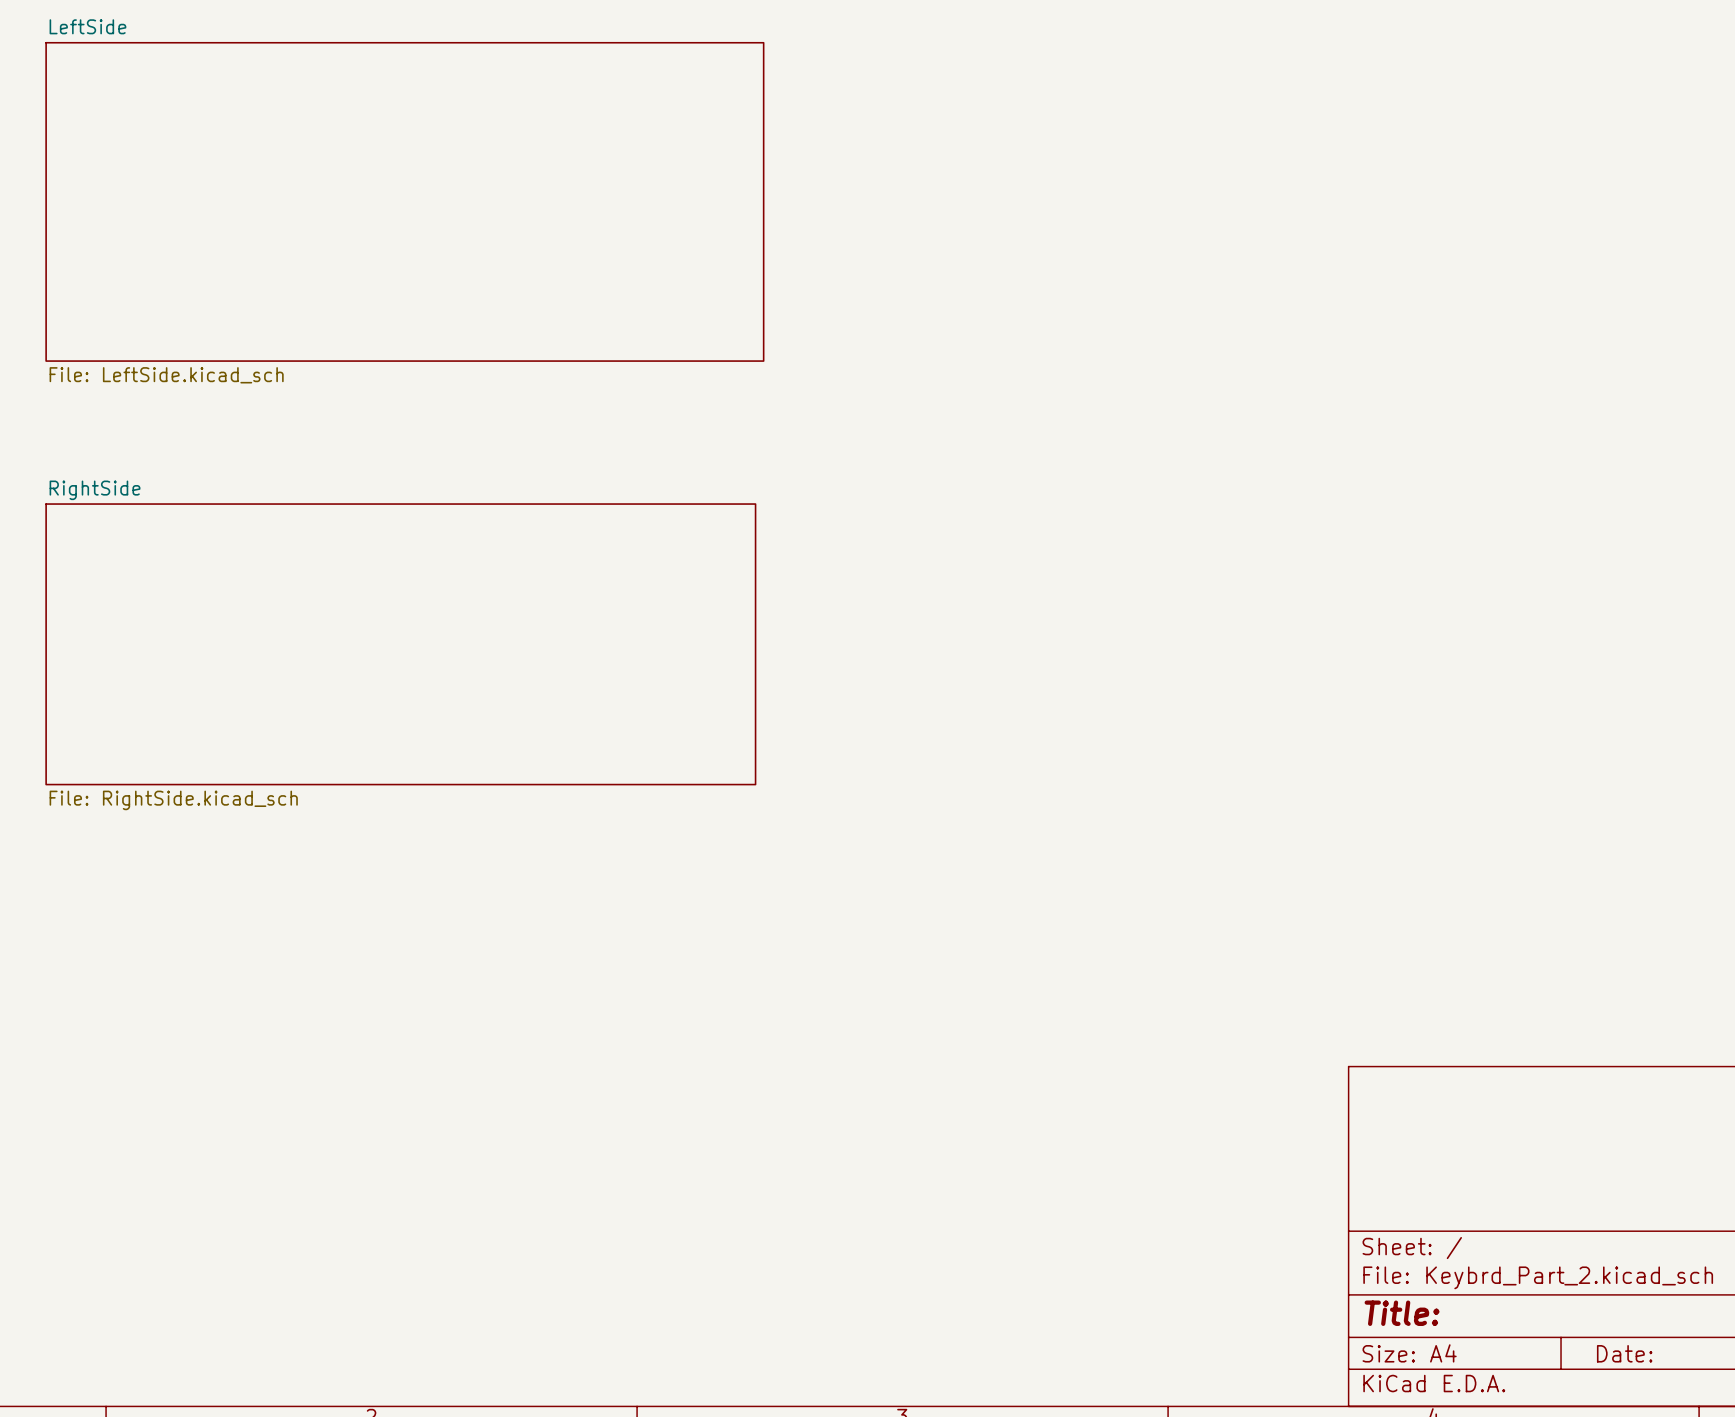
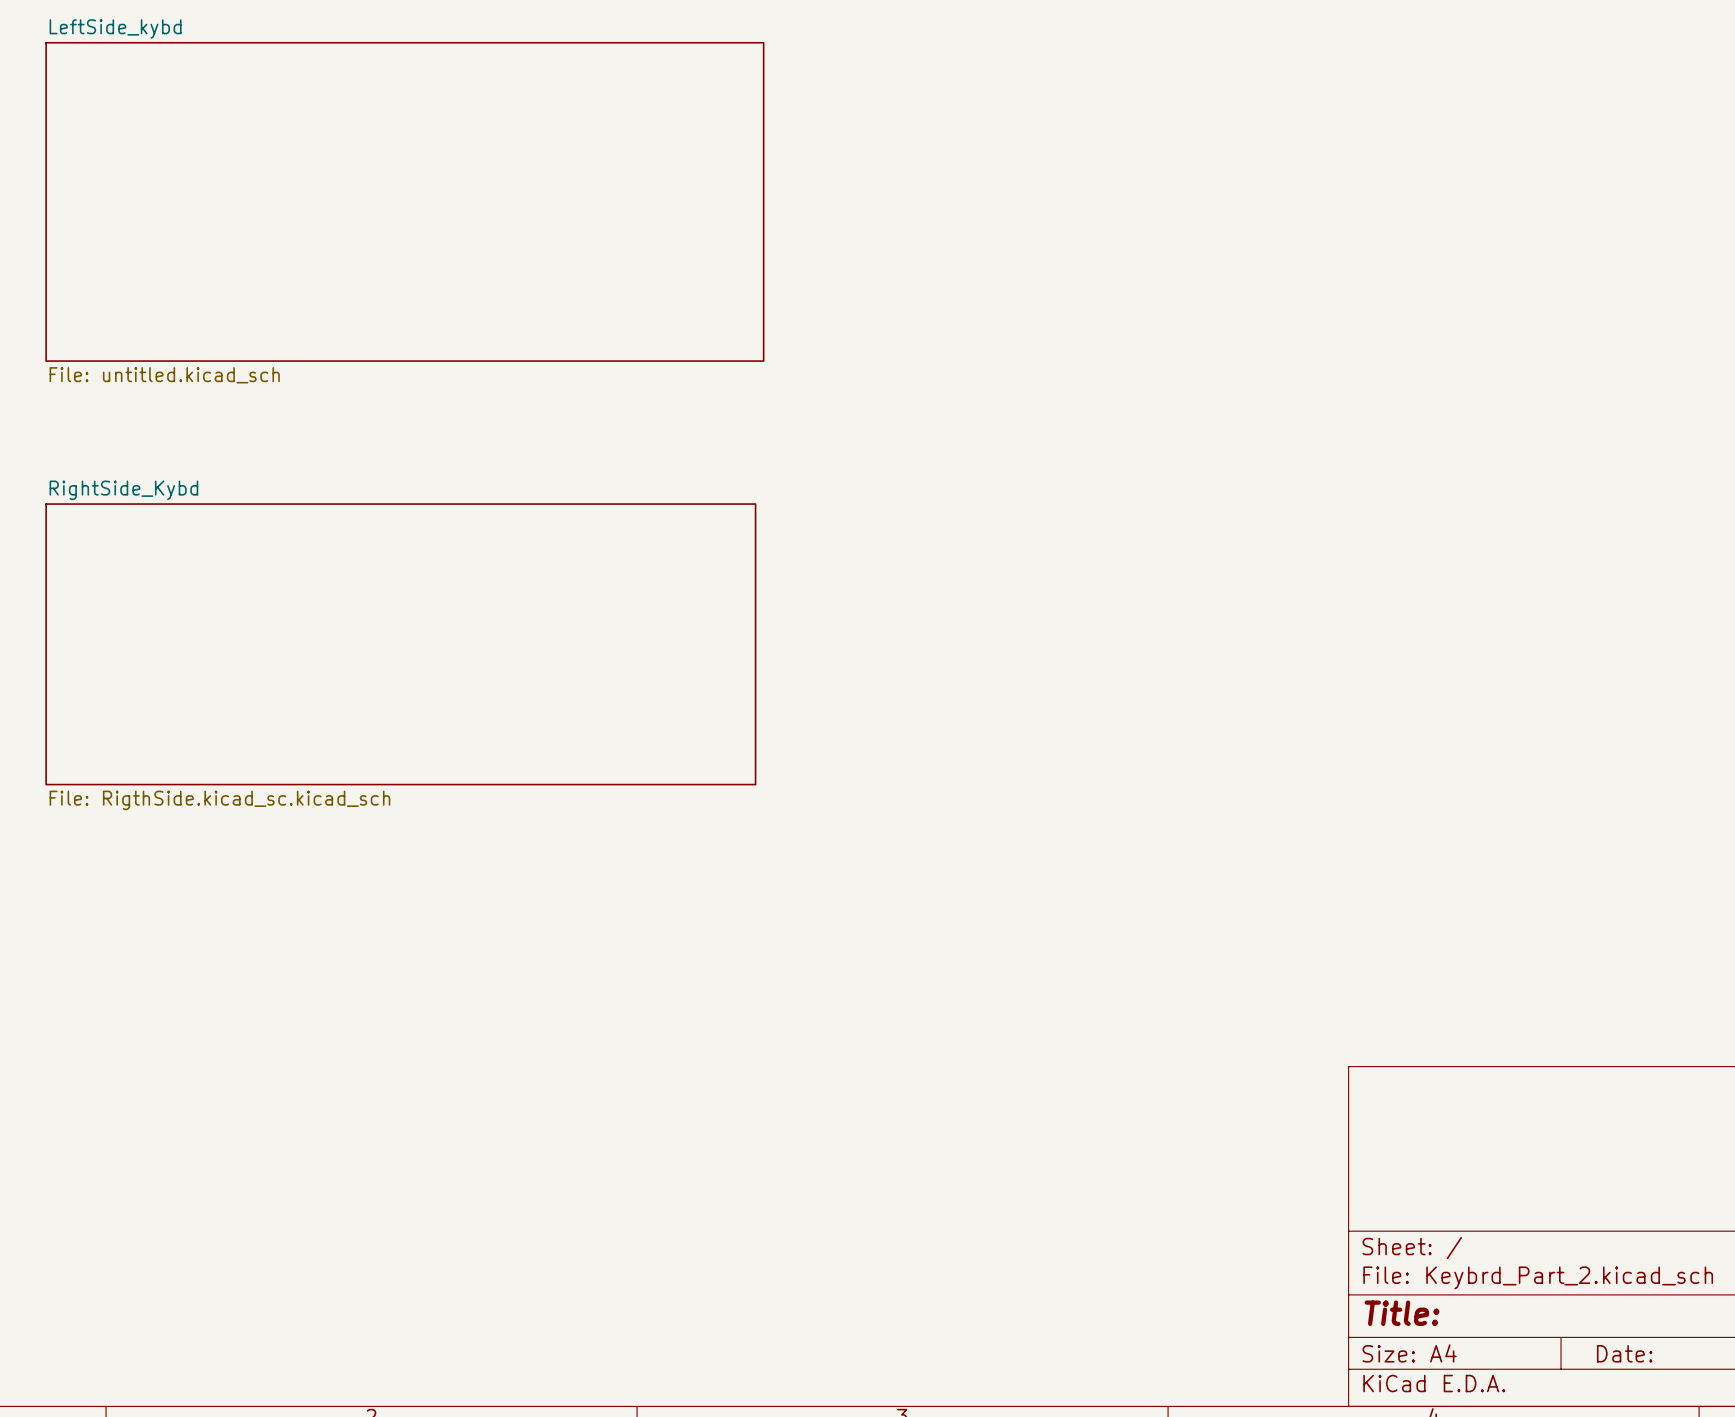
sheet LeftSide name: LeftSide (87, 26) -> LeftSide_kybd (115, 29)
sheet LeftSide value: File: LeftSide.kicad_sch (166, 375) -> File: untitled.kicad_sch (164, 375)
sheet RightSide name: RightSide (95, 490) -> RightSide_Kybd (123, 490)
sheet RightSide value: File: RightSide.kicad_sch (173, 800) -> File: RigthSide.kicad_sc.kicad_sch (219, 800)

